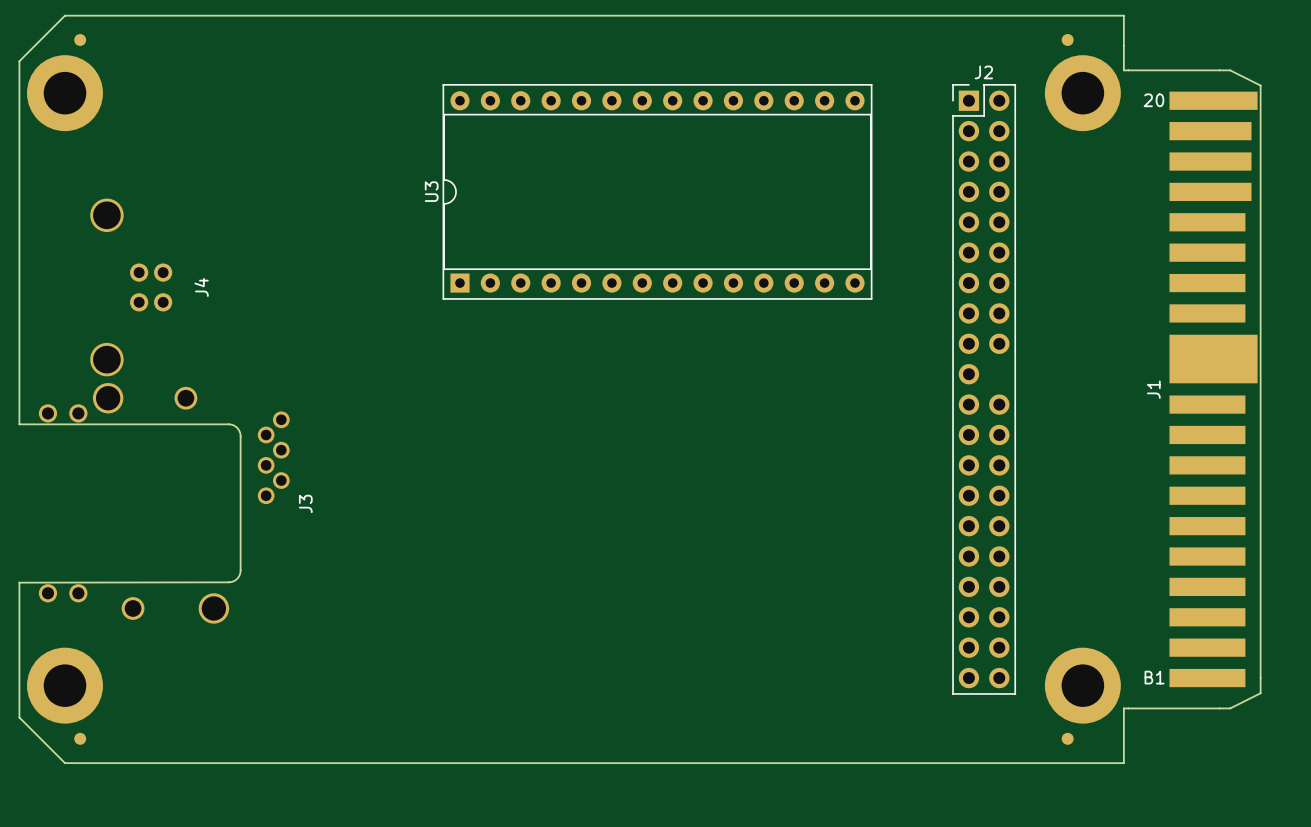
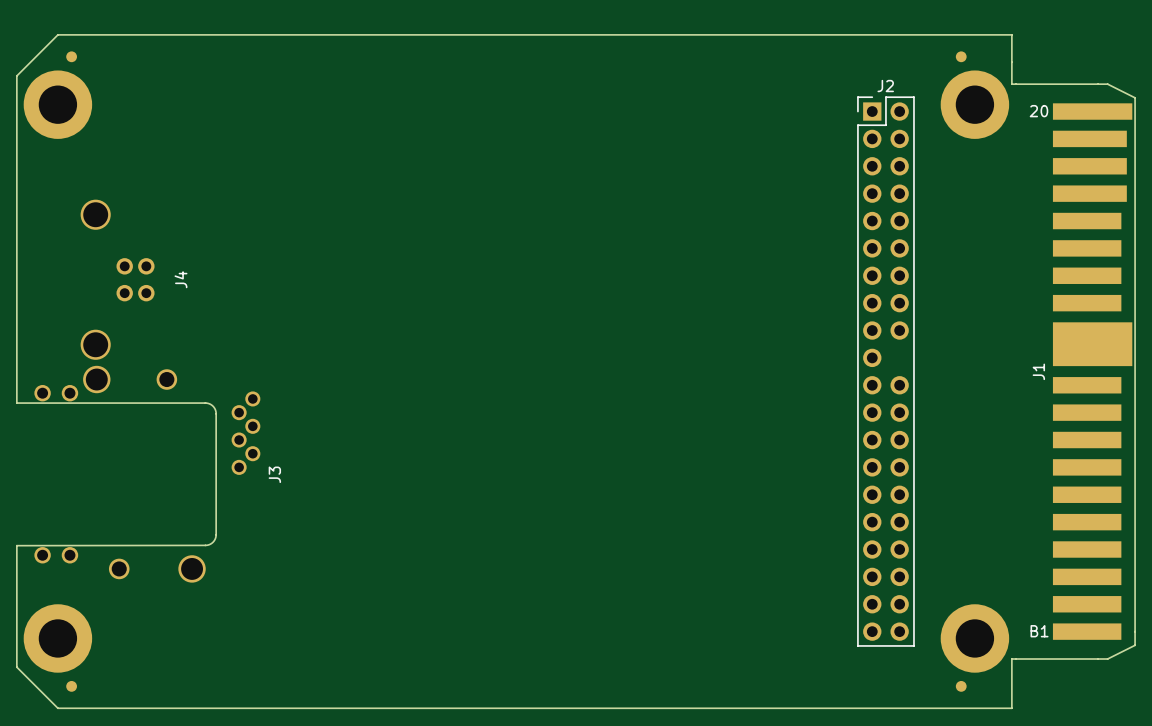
U3: (657, 191) -> none

